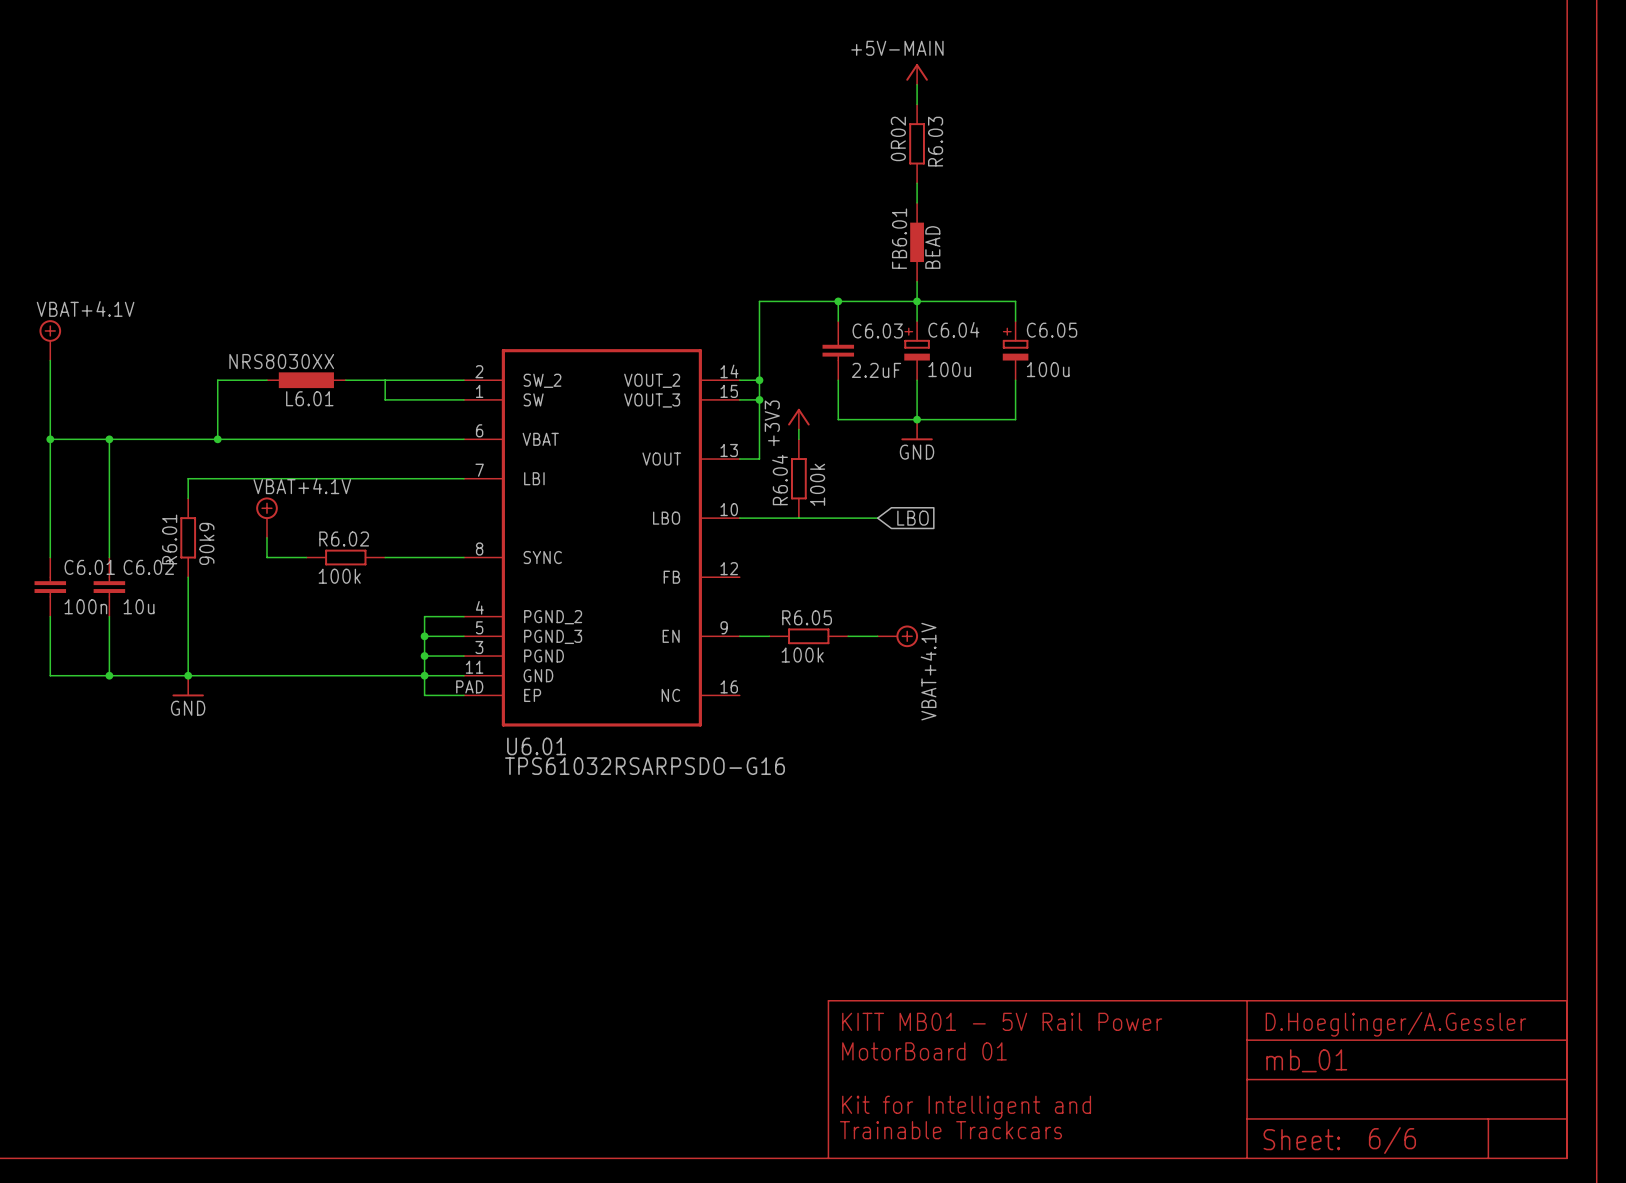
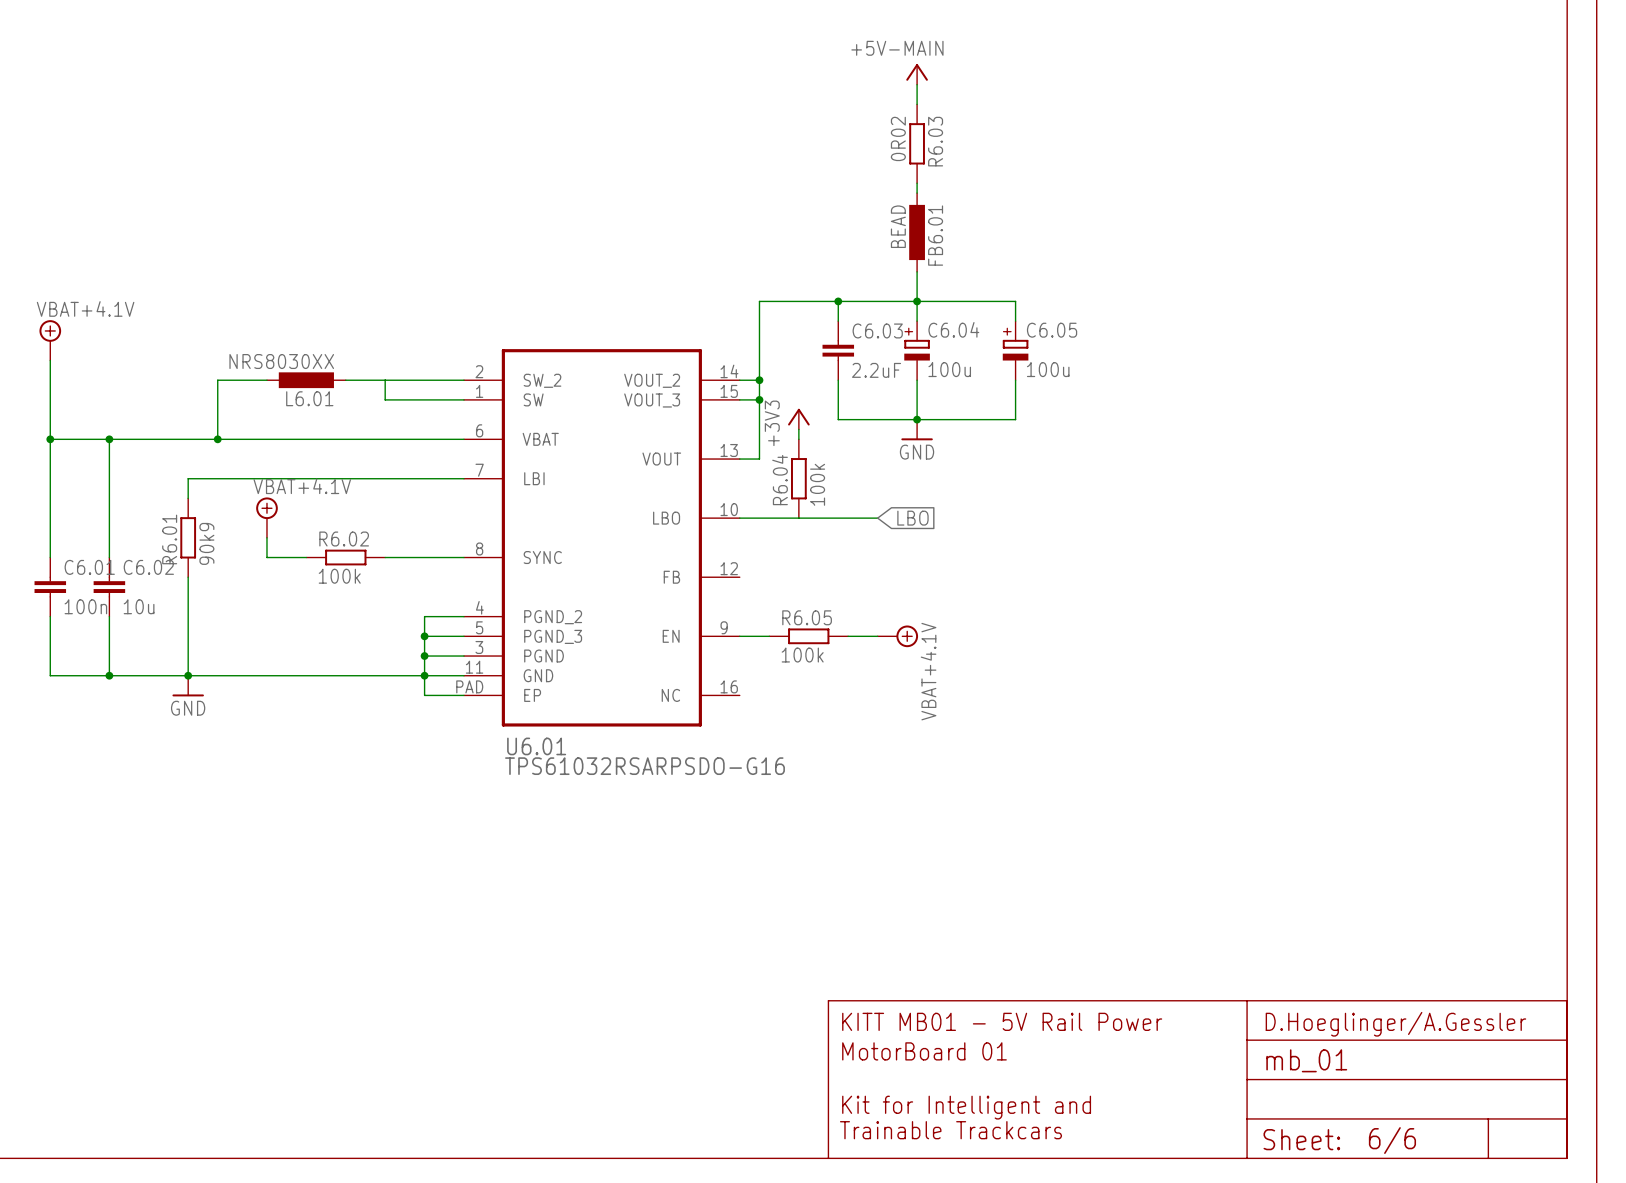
FB6.01 symbol: [910, 202, 924, 282] -> [909, 193, 925, 272]
FB6.01 name position: FB6.01 (899, 238) -> FB6.01 (935, 235)
FB6.01 value position: BEAD (932, 247) -> BEAD (898, 226)

